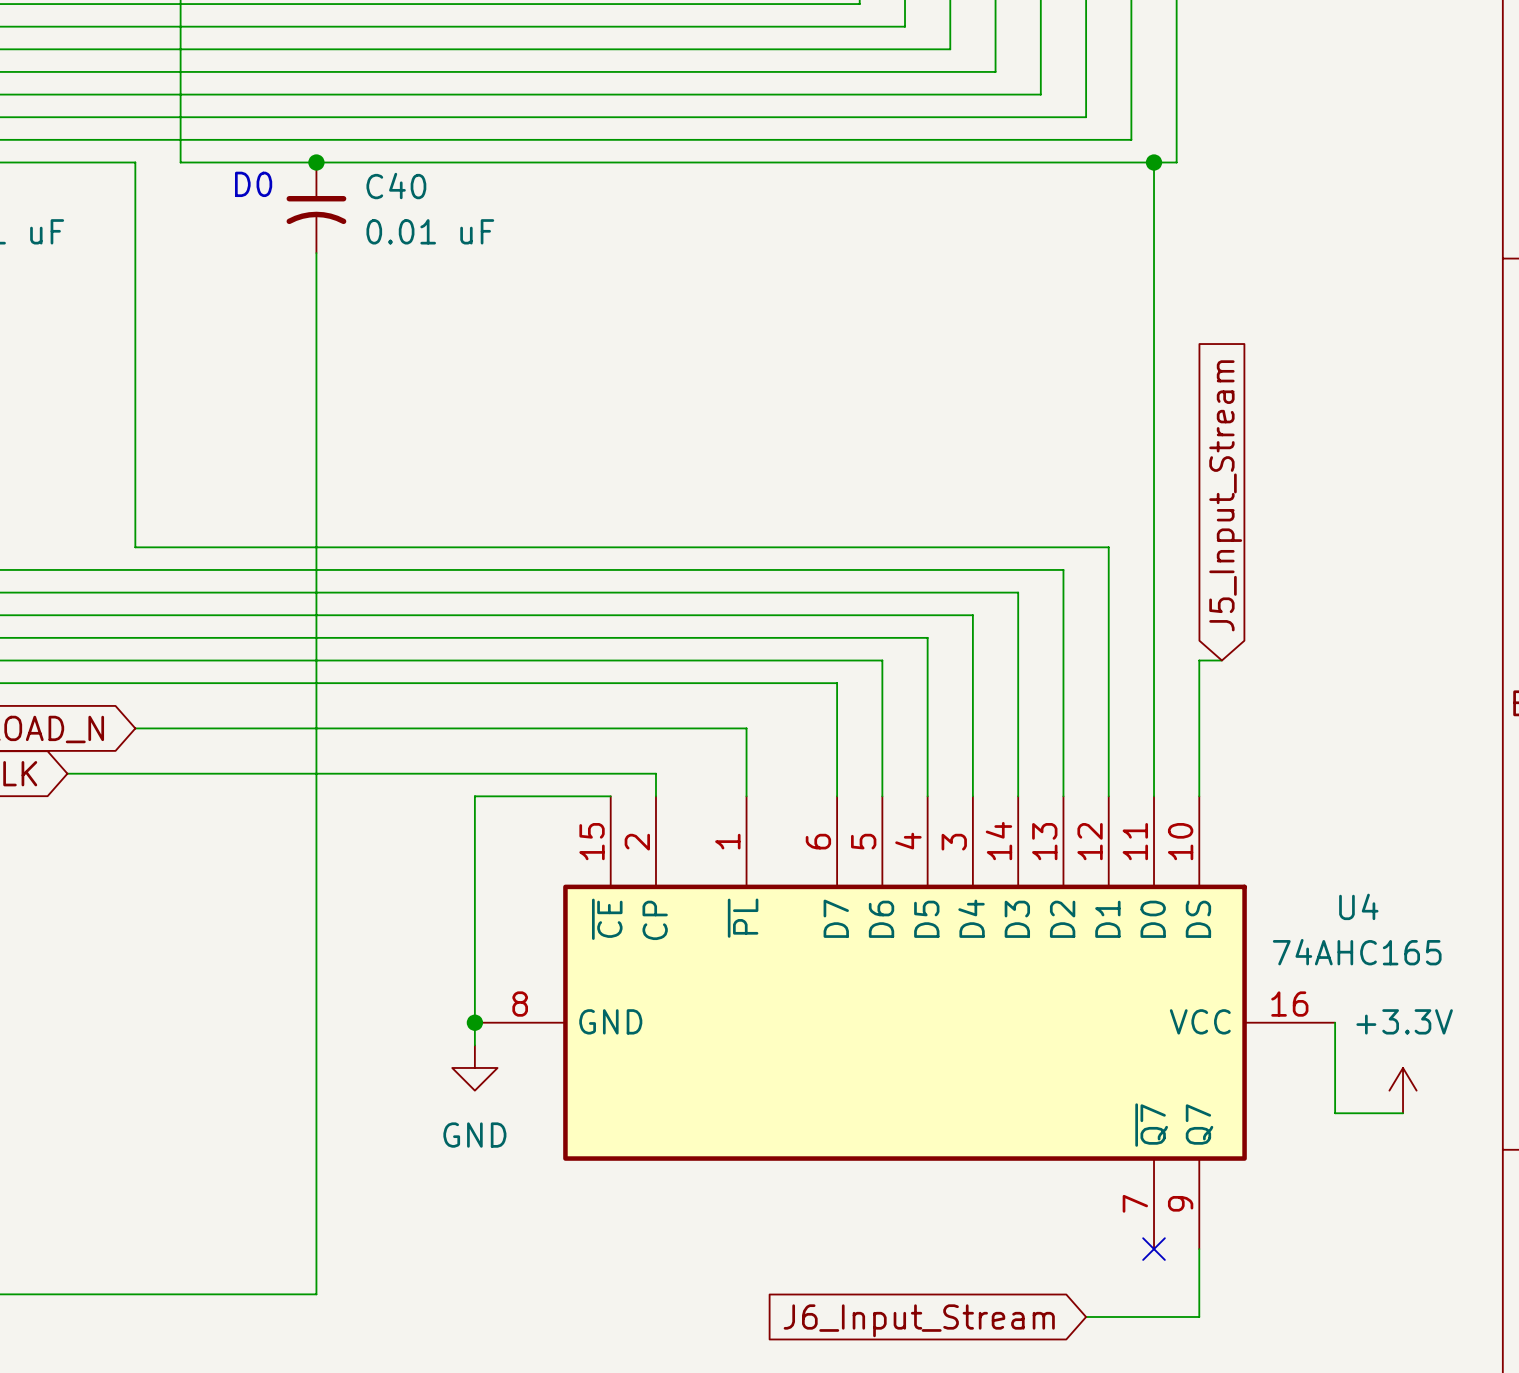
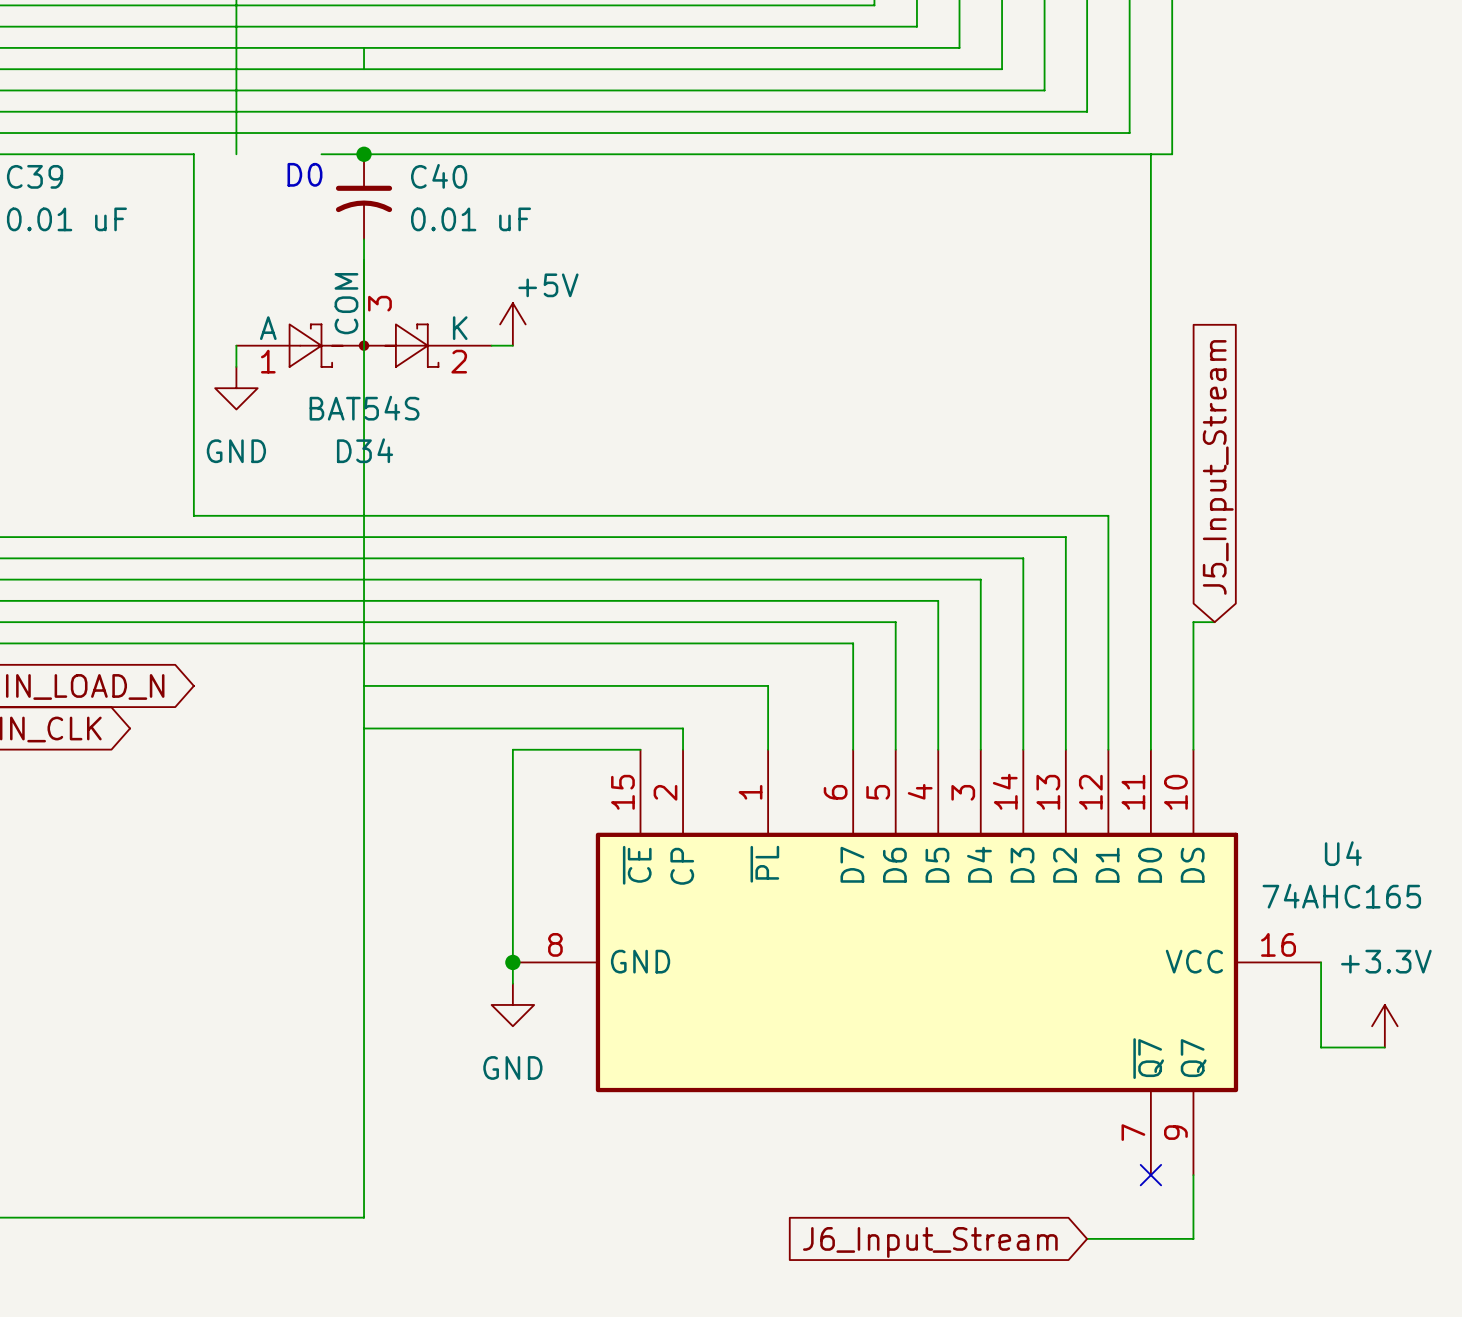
wire: none -> (364, 47) (364, 69)
wire: (180, 162) (271, 162) -> none
junction: (1154, 162) -> none
D34: none -> BAT54S (364, 313)
power symbol: none -> +5V (512, 324)
wire: none -> (236, 345) (236, 366)
wire: none -> (491, 345) (512, 345)
power symbol: none -> GND (236, 388)
wire: (135, 728) (316, 728) -> none
wire: (67, 773) (316, 773) -> none

